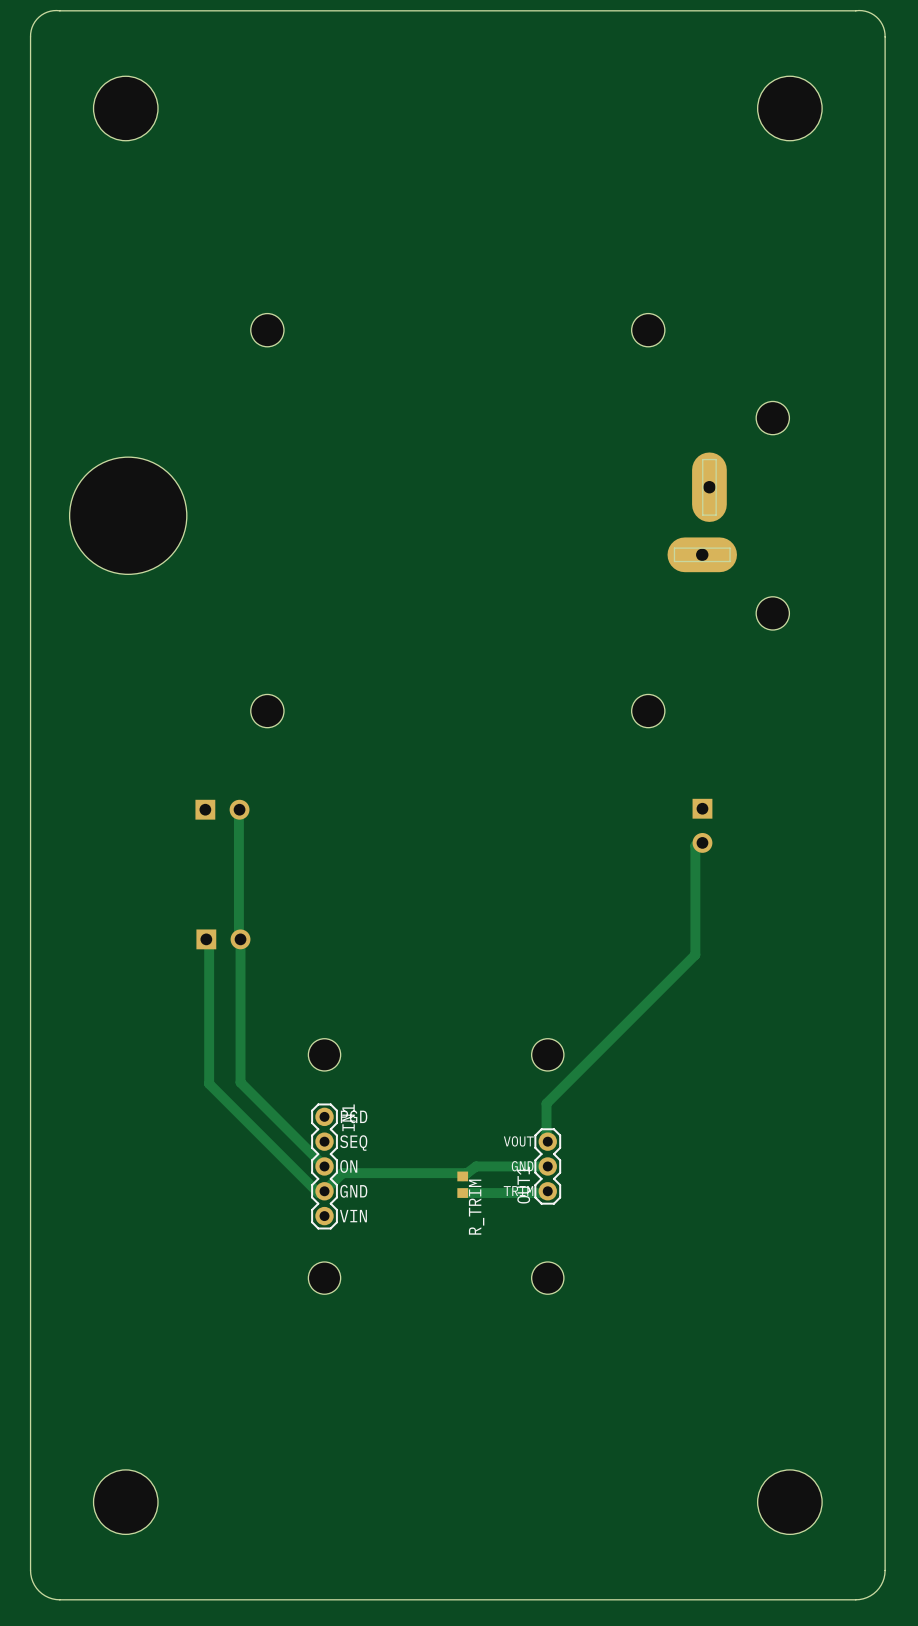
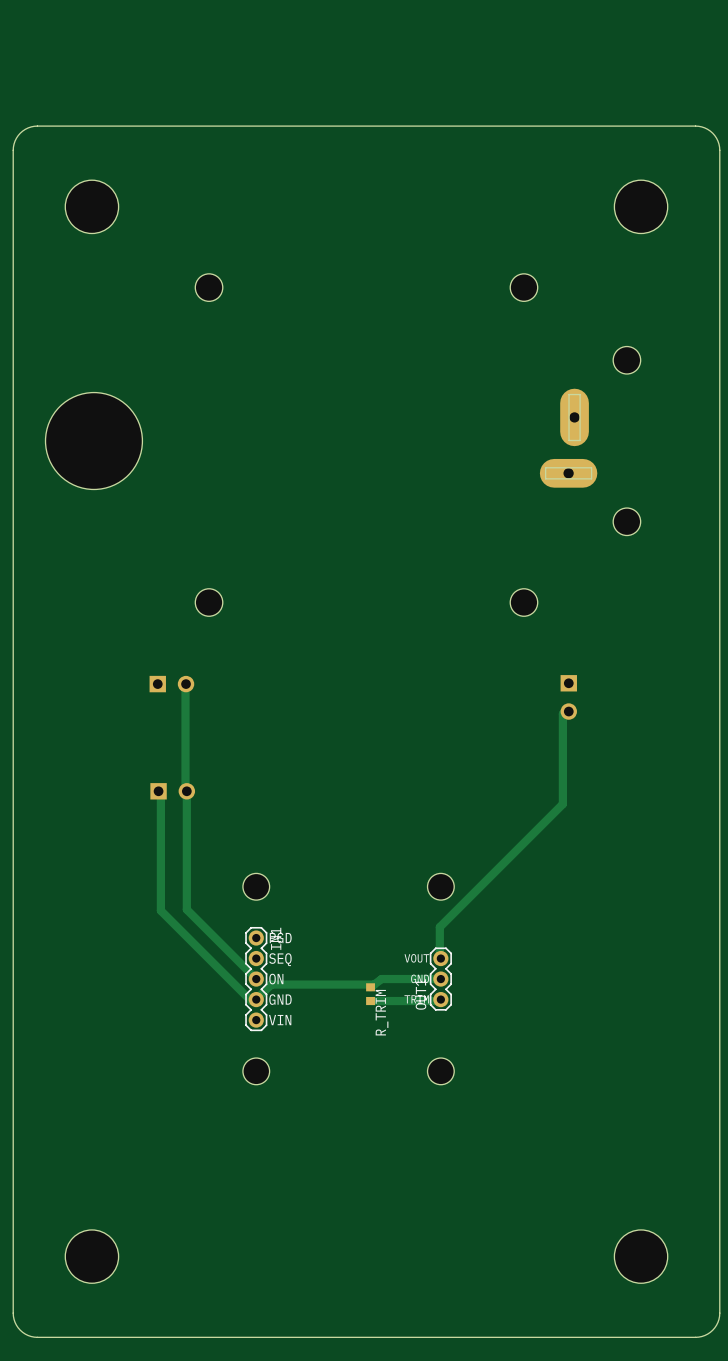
hole position: (125, 108) -> (91, 206)
hole position: (789, 108) -> (641, 206)
board edge: (30, 164) (31, 30) (39, 17) (47, 12) (56, 10) (865, 11) (878, 19) (884, 33) (885, 164) -> (13, 150) (15, 141) (20, 133) (28, 127) (37, 126) (695, 126) (704, 127) (712, 133) (717, 141) (719, 150)

